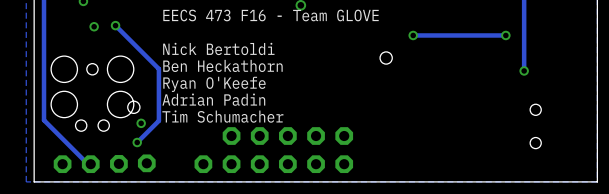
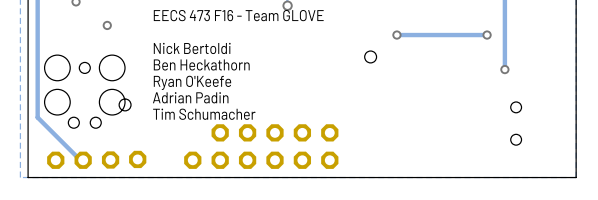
track: (115, 25) (158, 68) (158, 120) (137, 142) -> none
via: (94, 26) -> none
via: (141, 123) -> none
via: (137, 142) -> none

